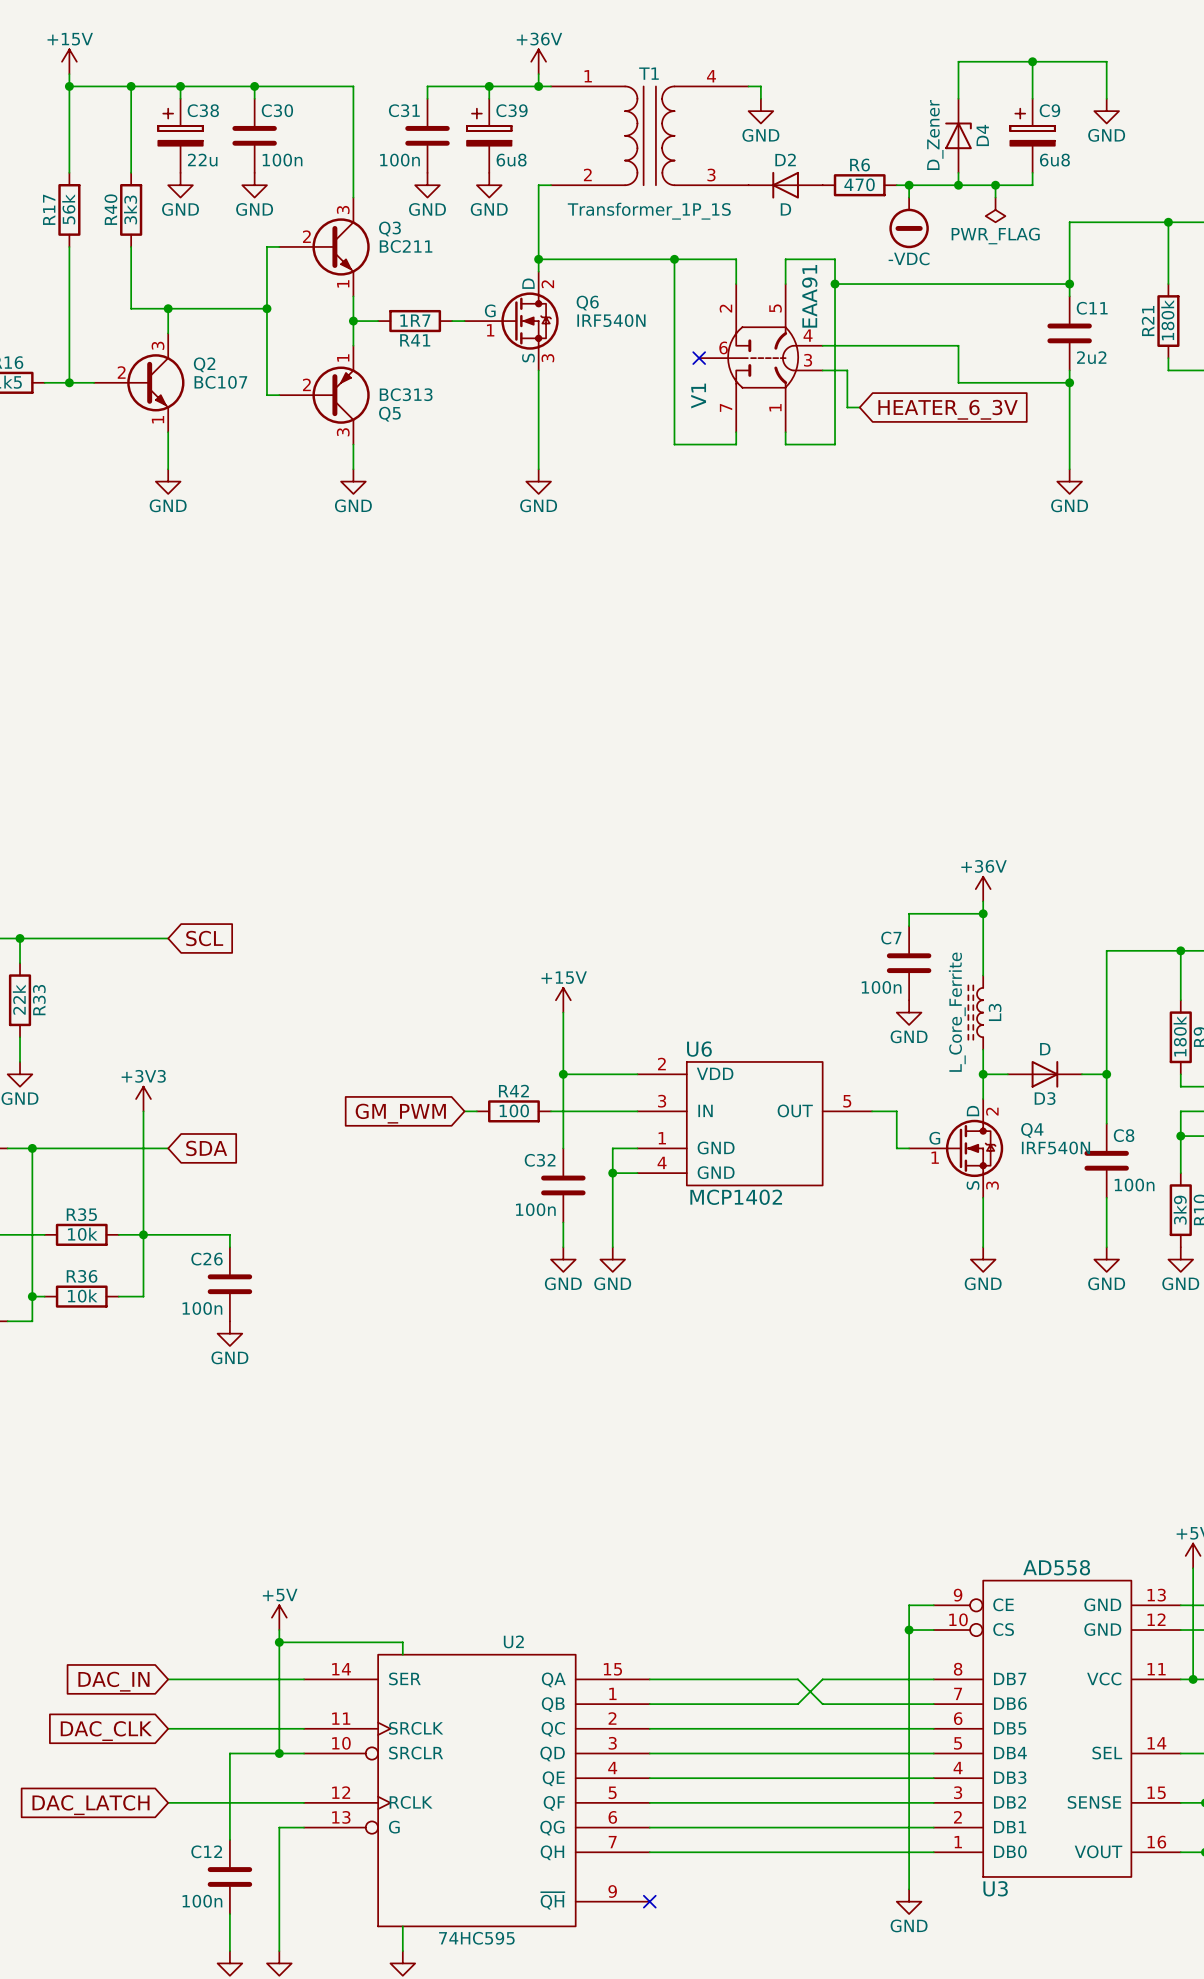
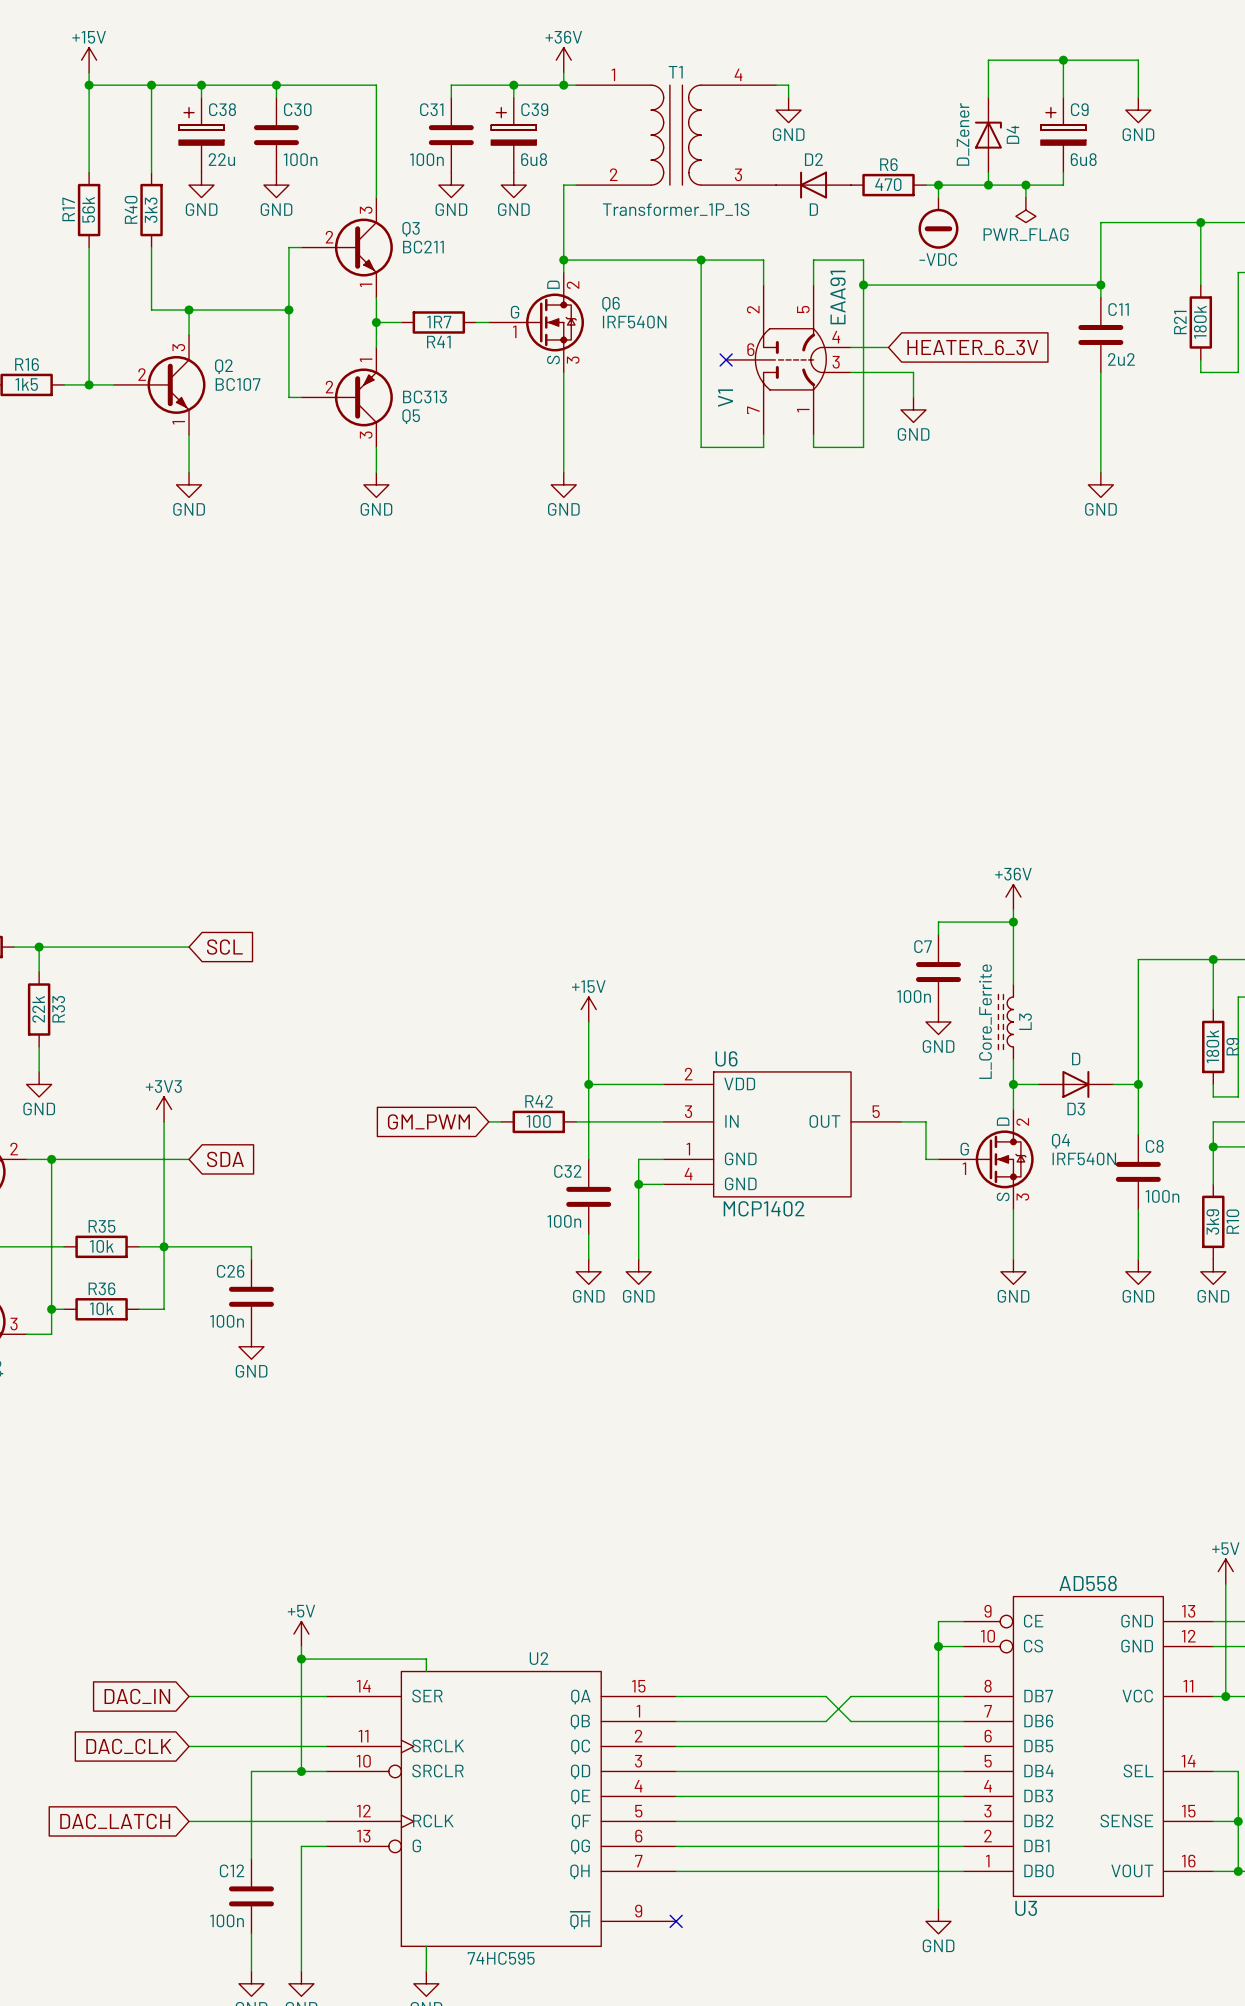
wire: (859, 345) (958, 345) (958, 382) (1069, 382) -> none
wire: (847, 370) (847, 407) (859, 407) -> (876, 372) (913, 372) (913, 397)
junction: (1069, 382) -> none
power symbol: none -> GND (913, 409)
global label position: HEATER_6_3V (948, 409) -> HEATER_6_3V (972, 347)

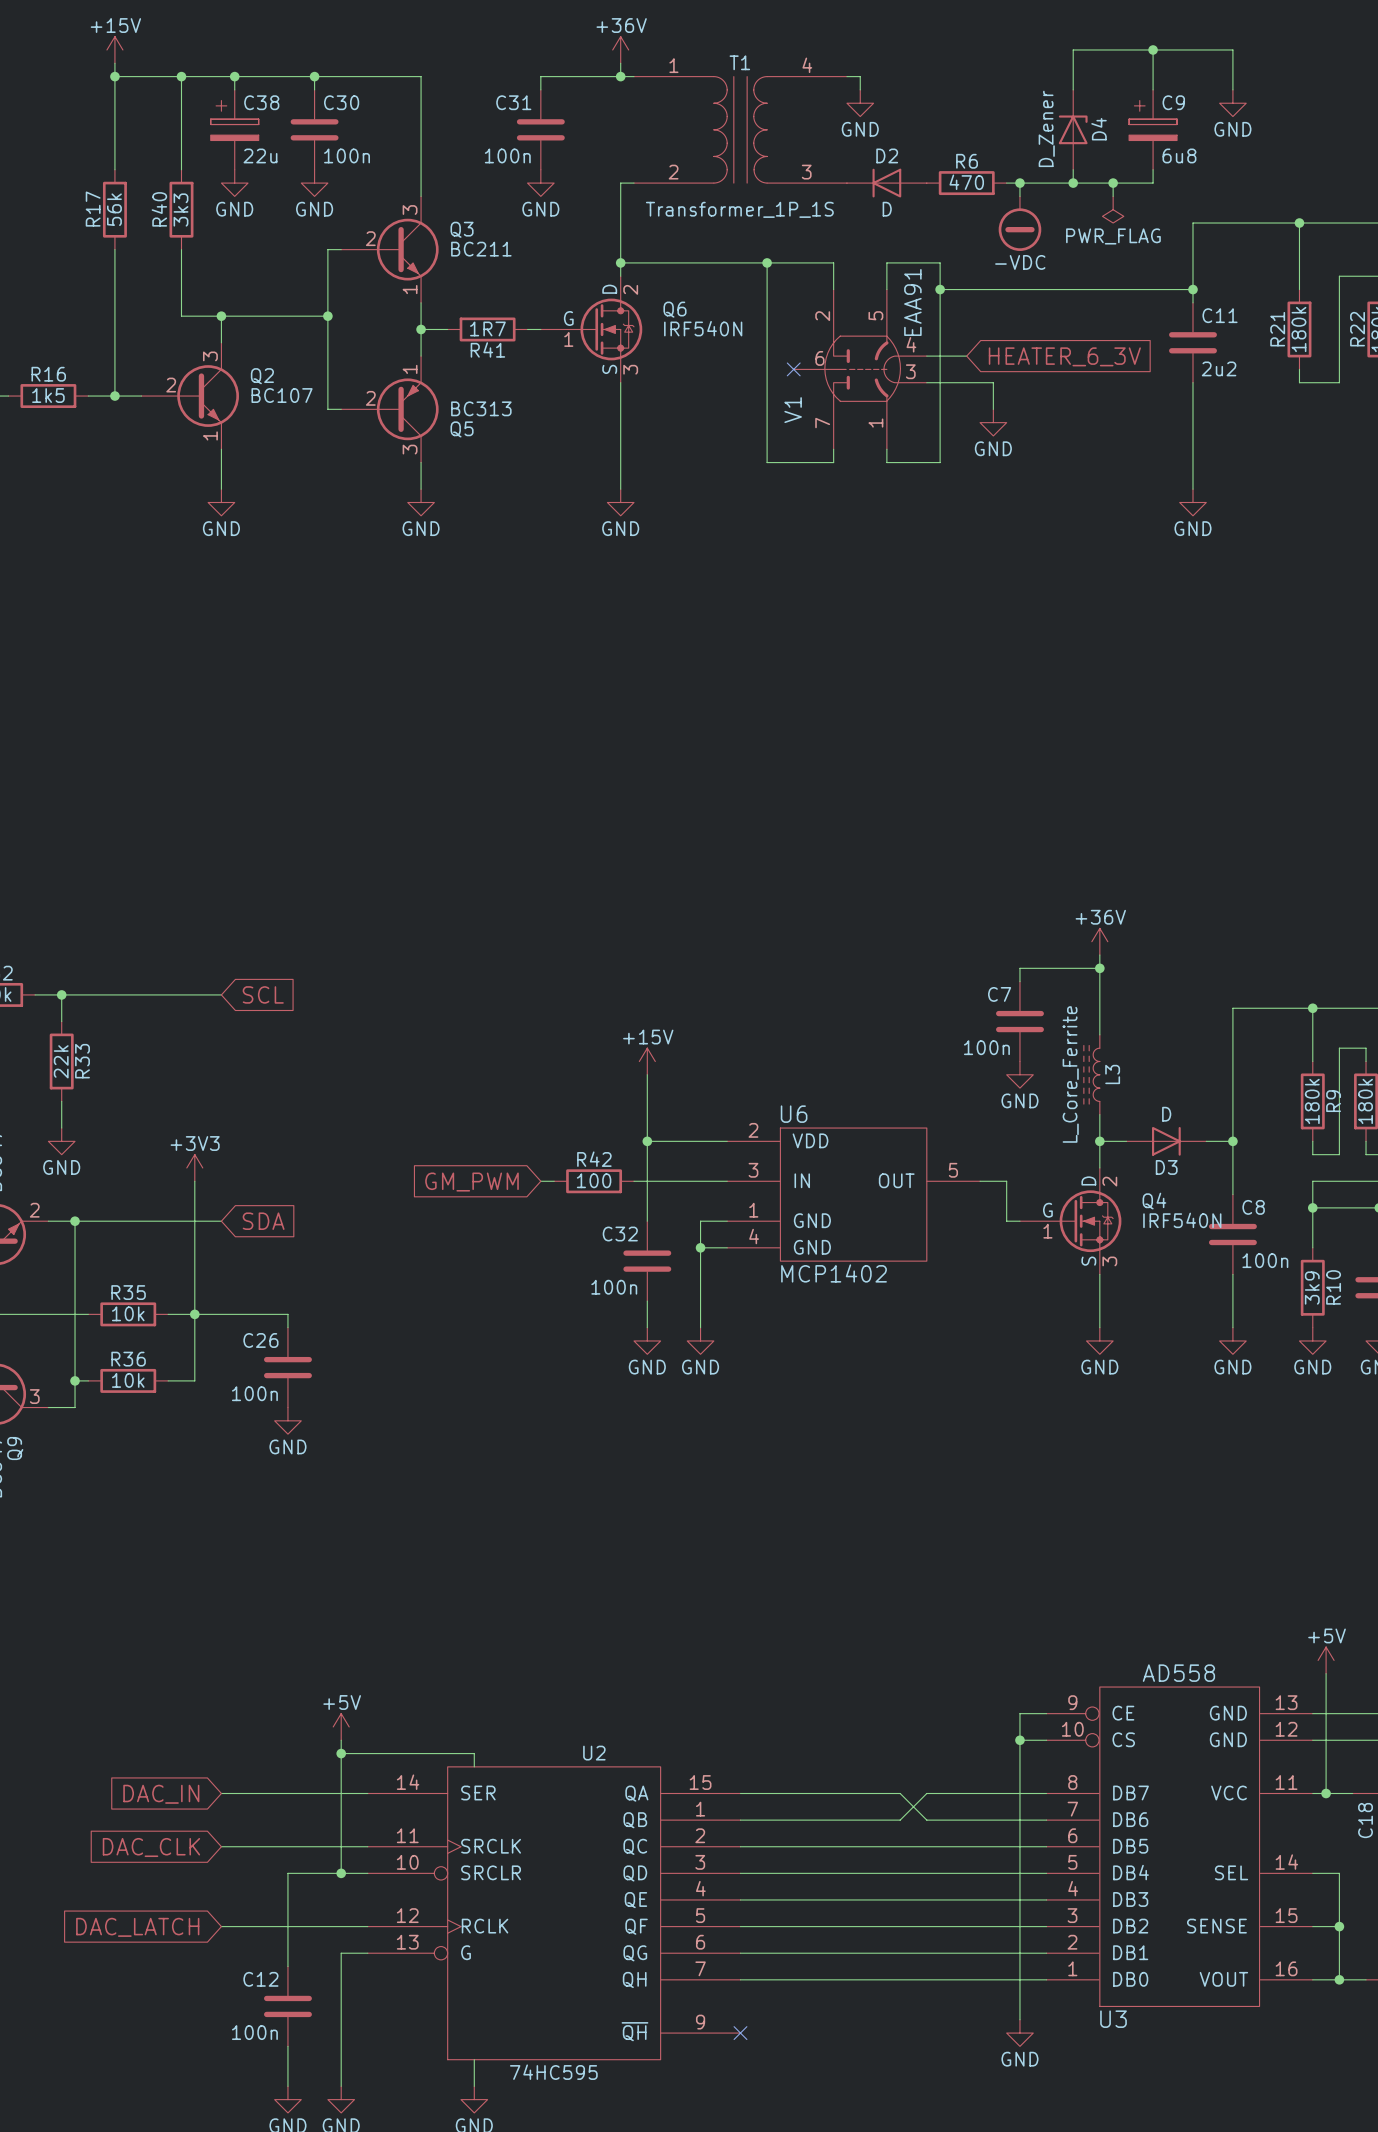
wire: (488, 85) (451, 85) (451, 97) -> (540, 76) (540, 89)
wire: (513, 85) (513, 97) -> none
junction: (513, 85) -> none
C31 position: (451, 135) -> (540, 129)
C39: 6u8 (513, 135) -> none
power symbol: GND (451, 185) -> none
power symbol: none -> GND (540, 183)
power symbol: GND (513, 185) -> none

